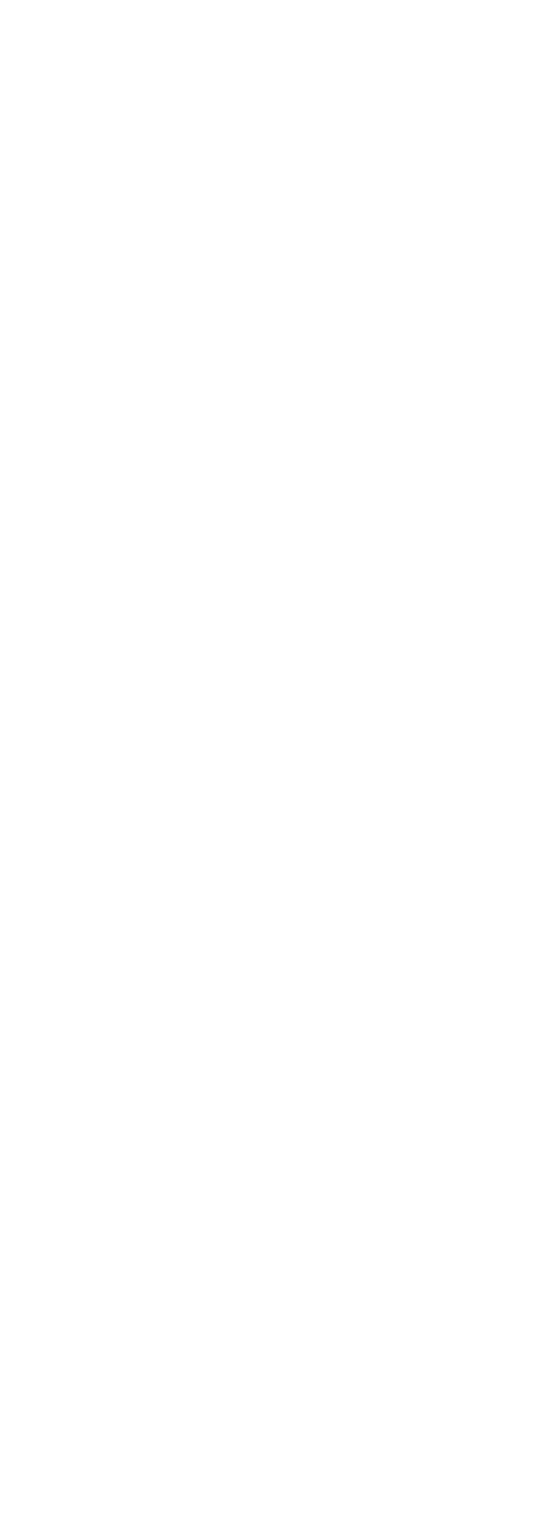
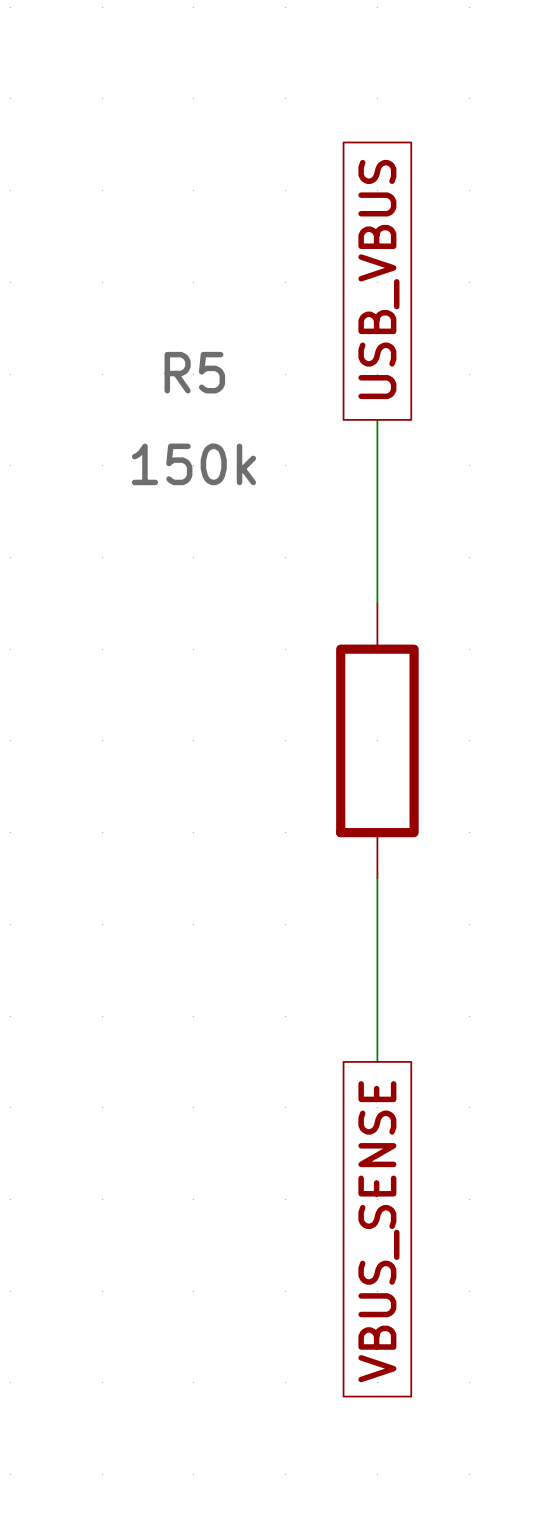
global label: none -> USB_VBUS (378, 279)
wire: none -> (377, 419) (377, 603)
R5: none -> 150k (377, 740)
wire: none -> (377, 878) (377, 1061)
global label: none -> VBUS_SENSE (378, 1231)

